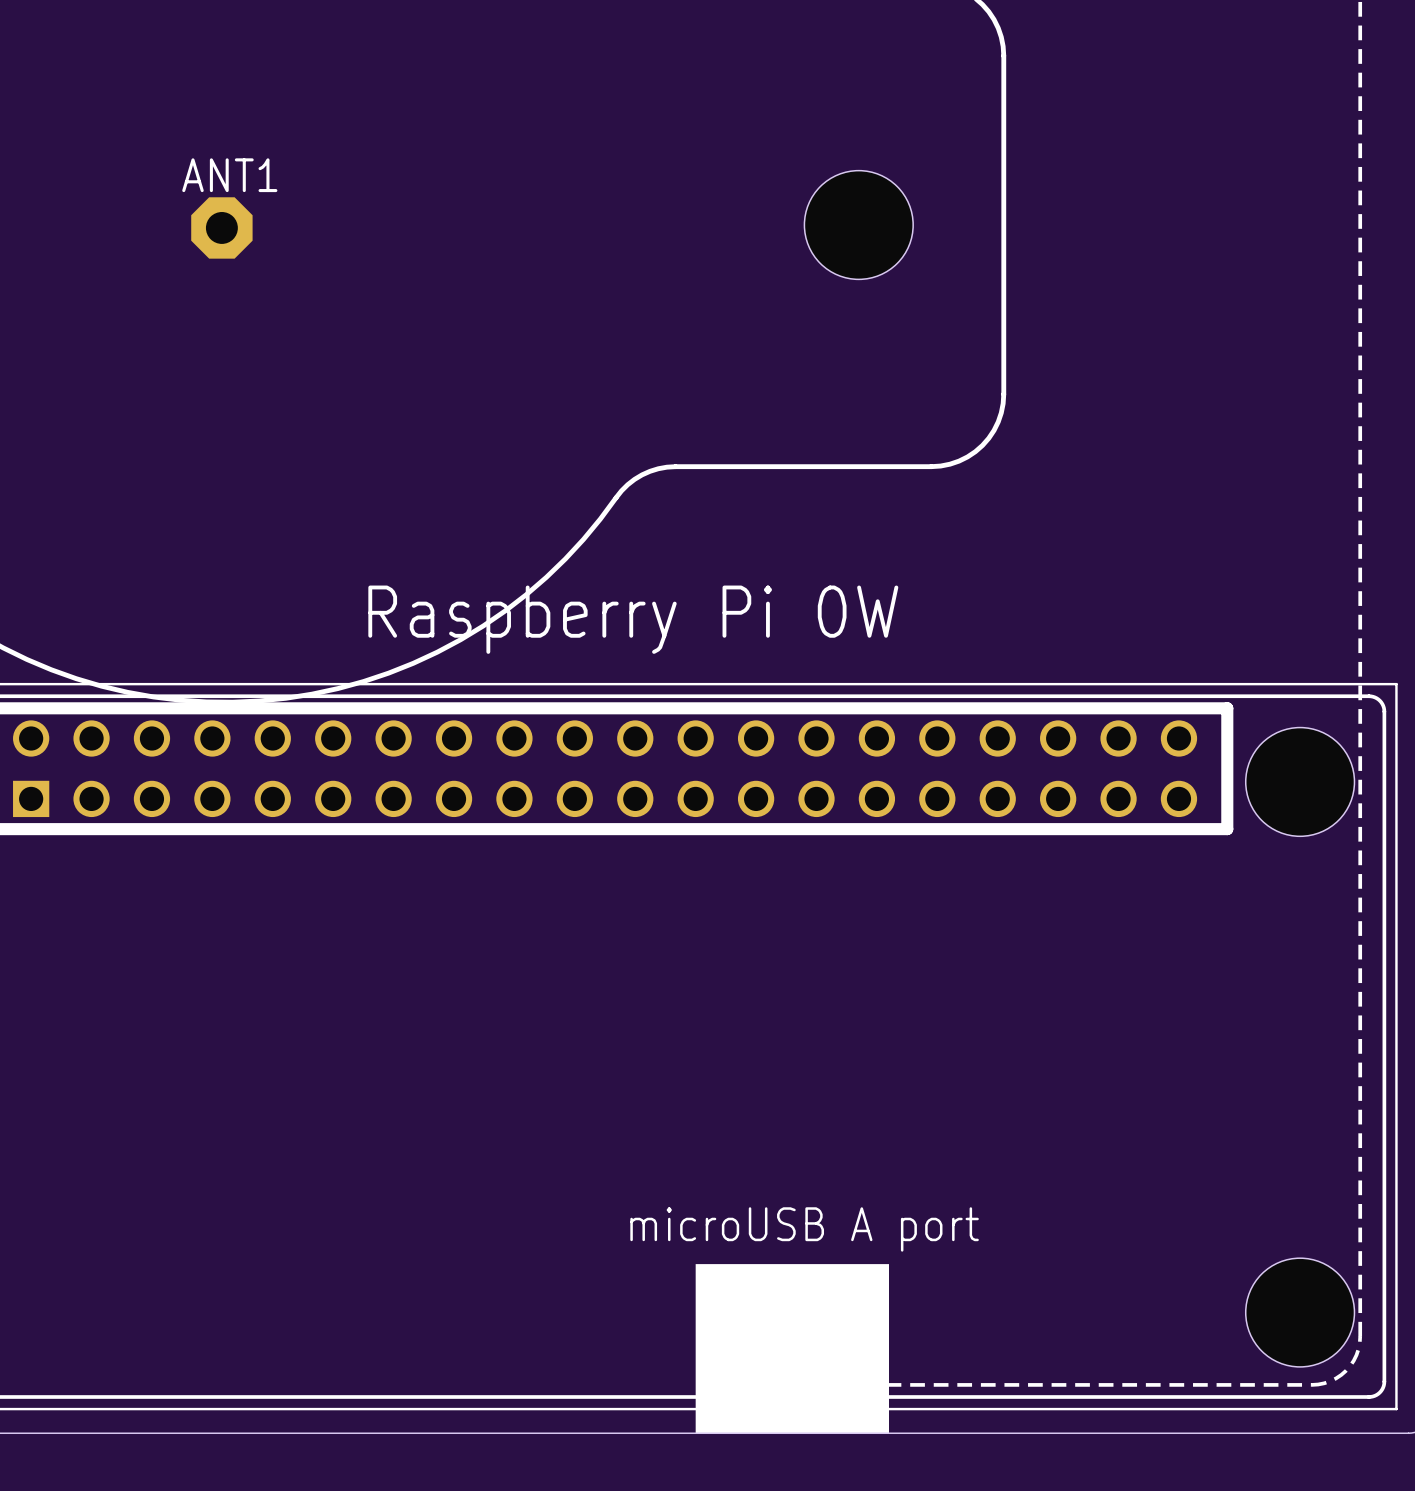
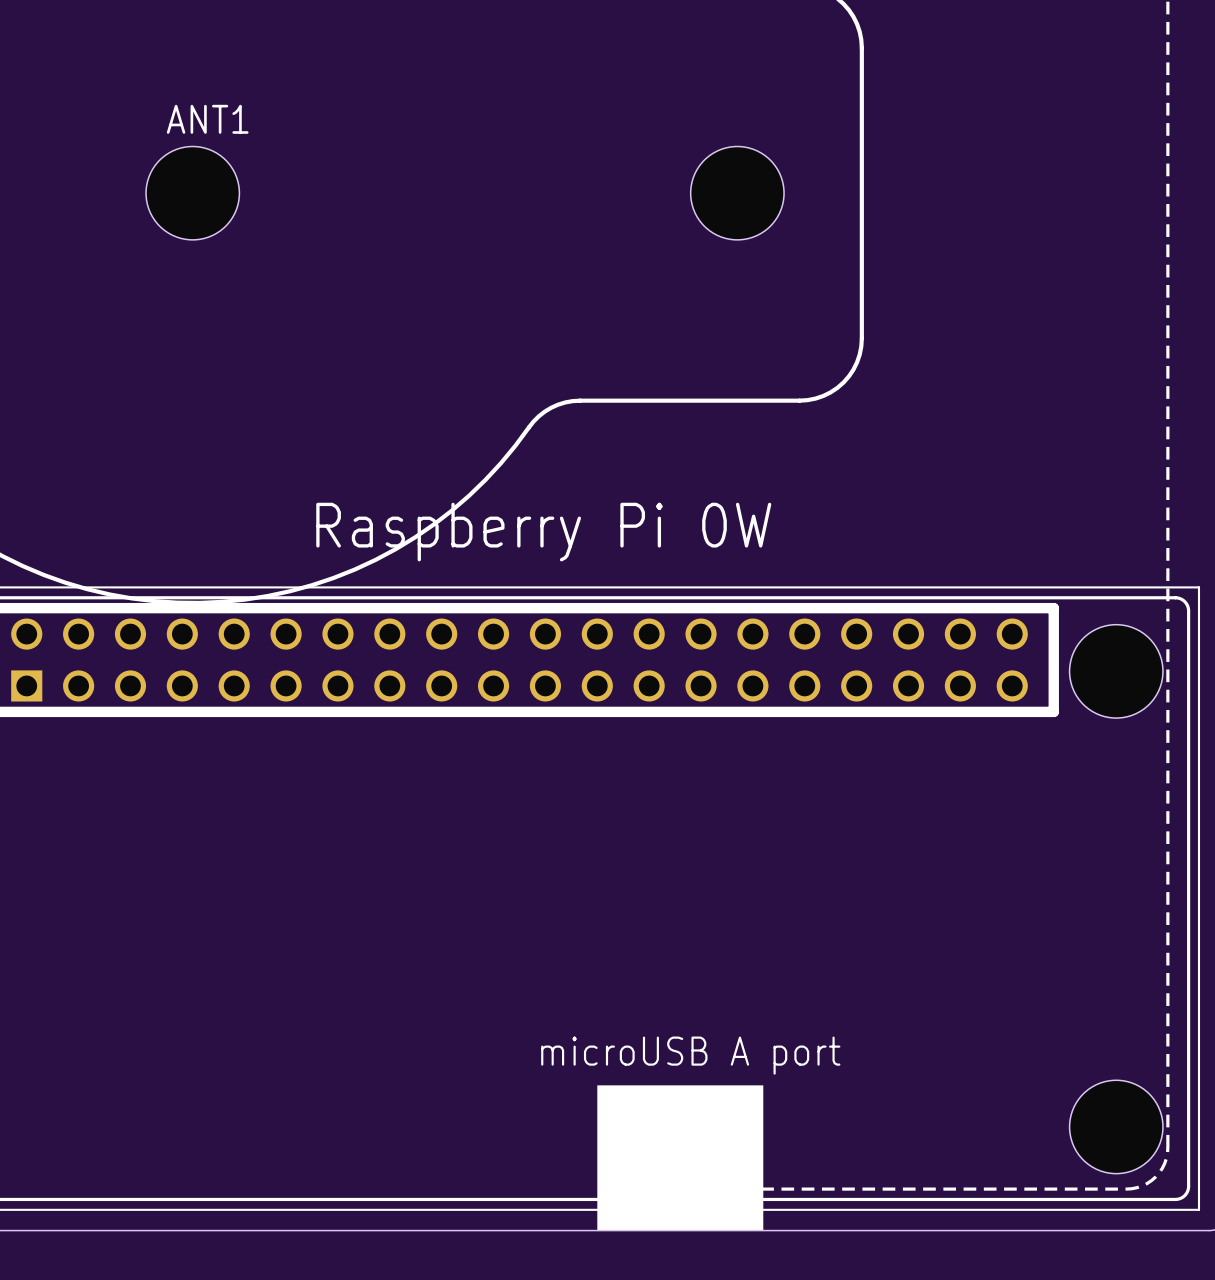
ANT1 name position: ANT1 (229, 175) -> ANT1 (207, 119)
hole: none -> (192, 193)

